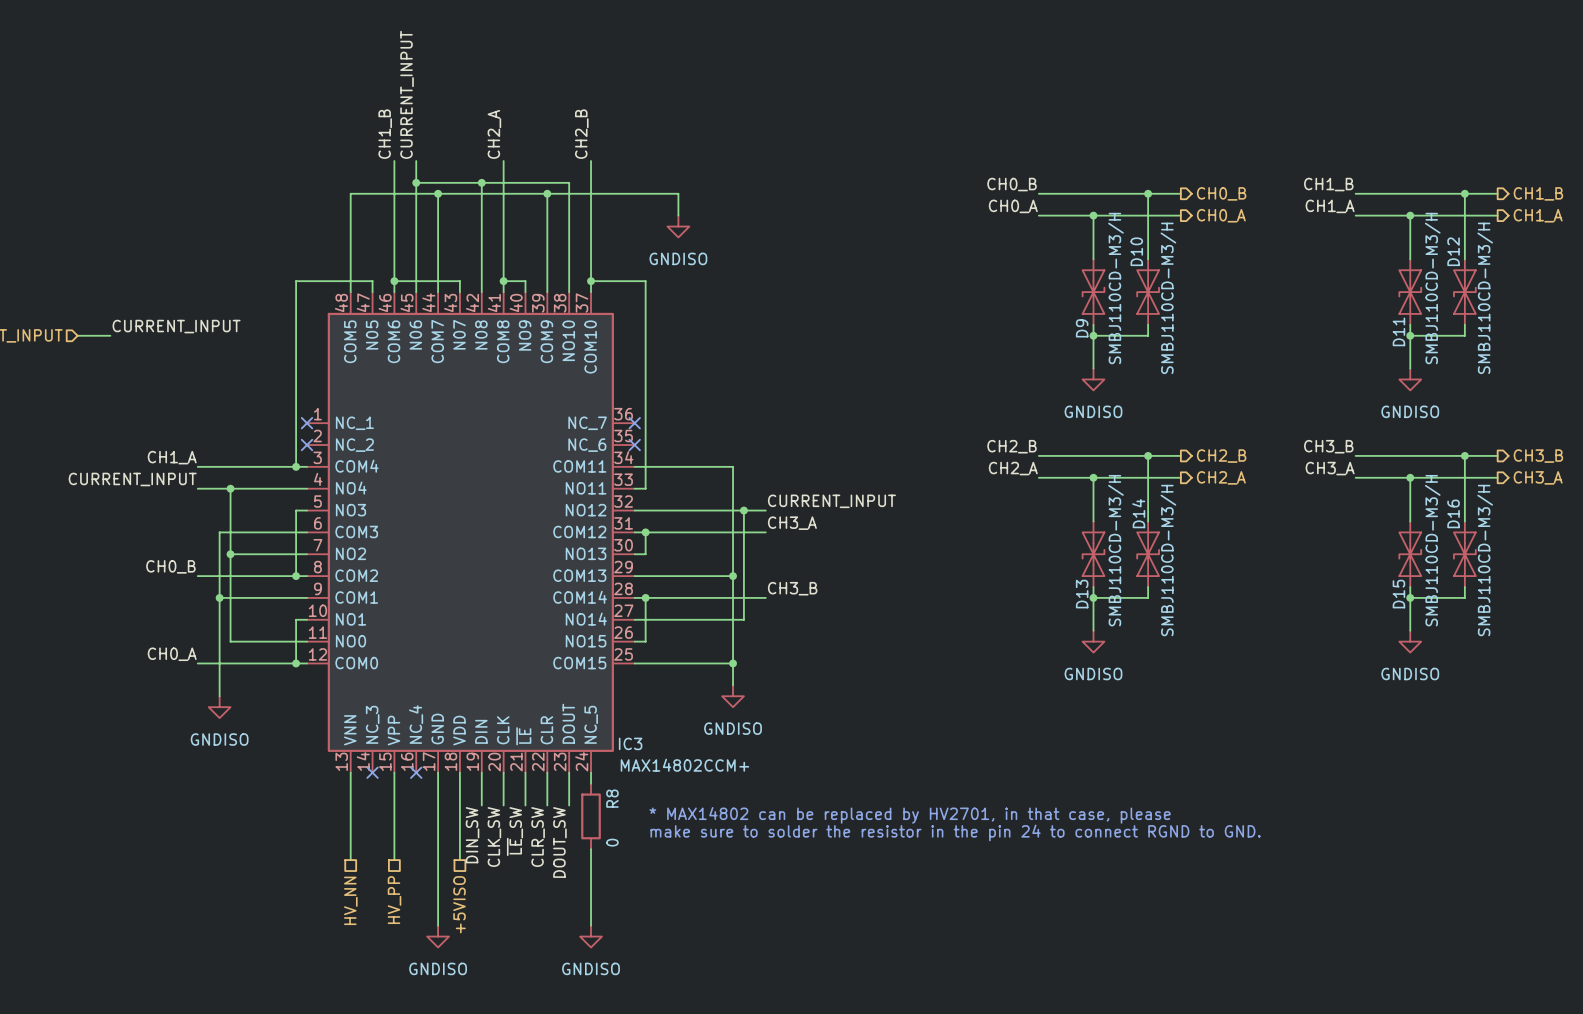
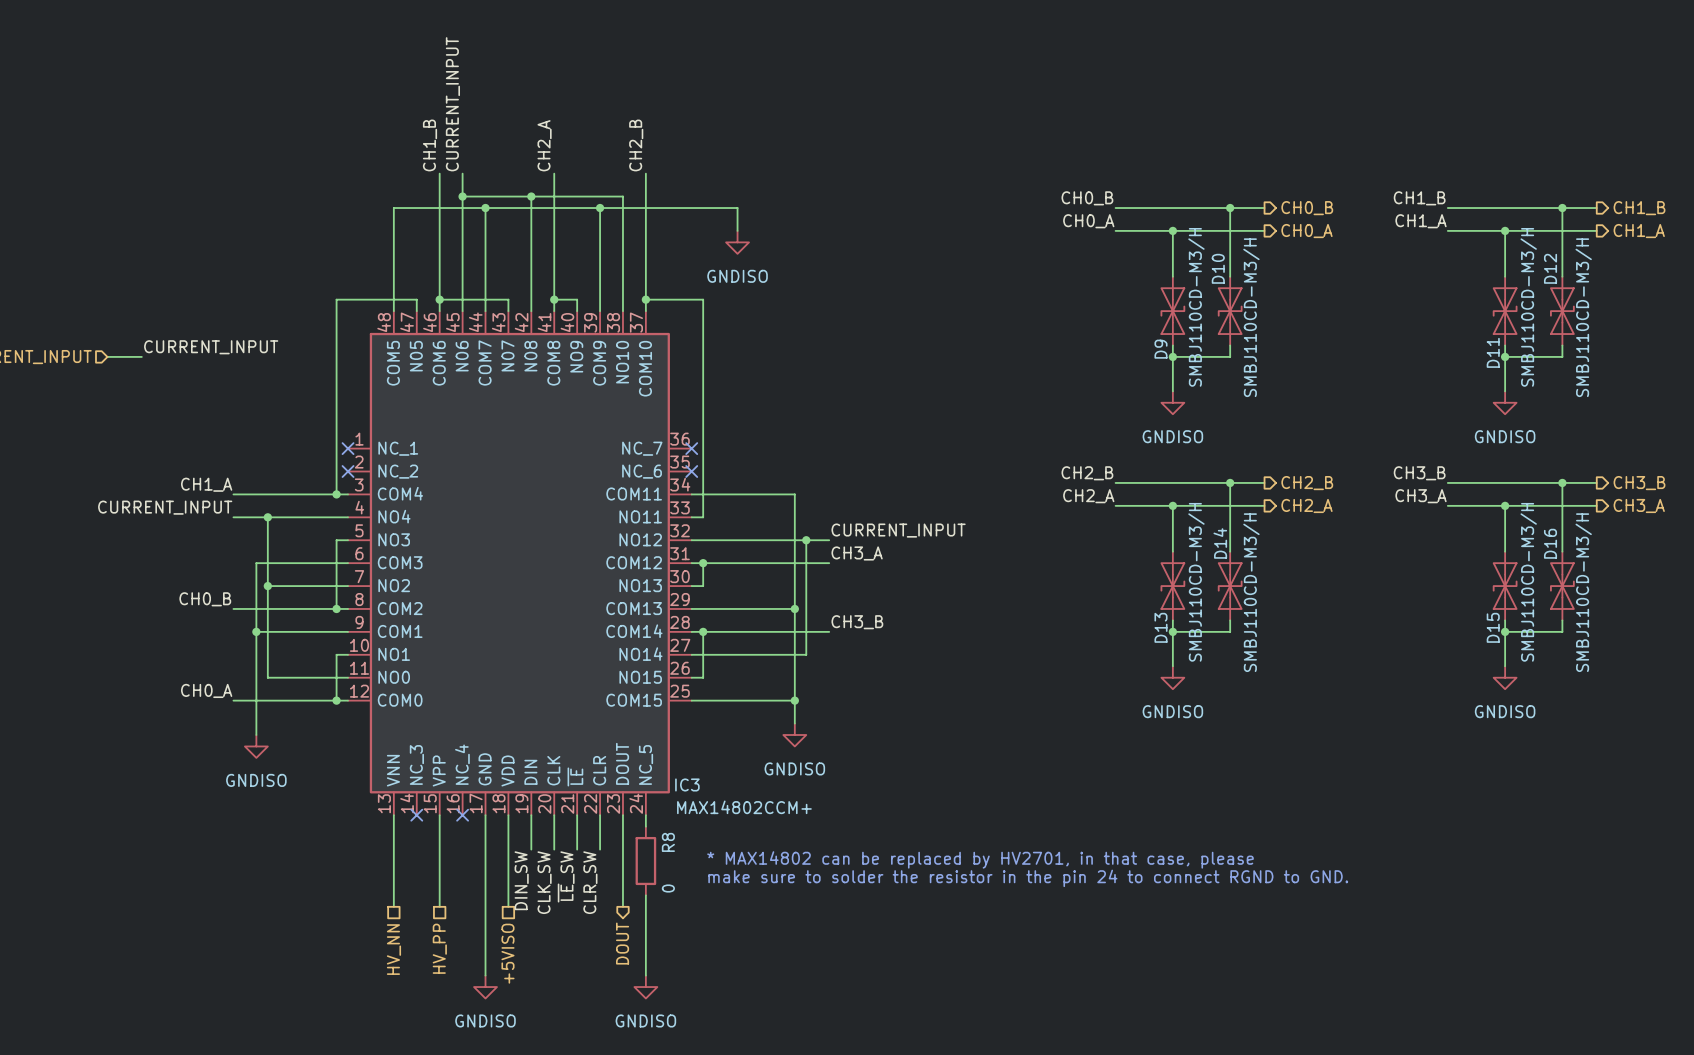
wire: none -> (622, 849) (622, 906)
label: DOUT_SW (559, 842) -> none
hierarchical label: none -> DOUT (622, 943)

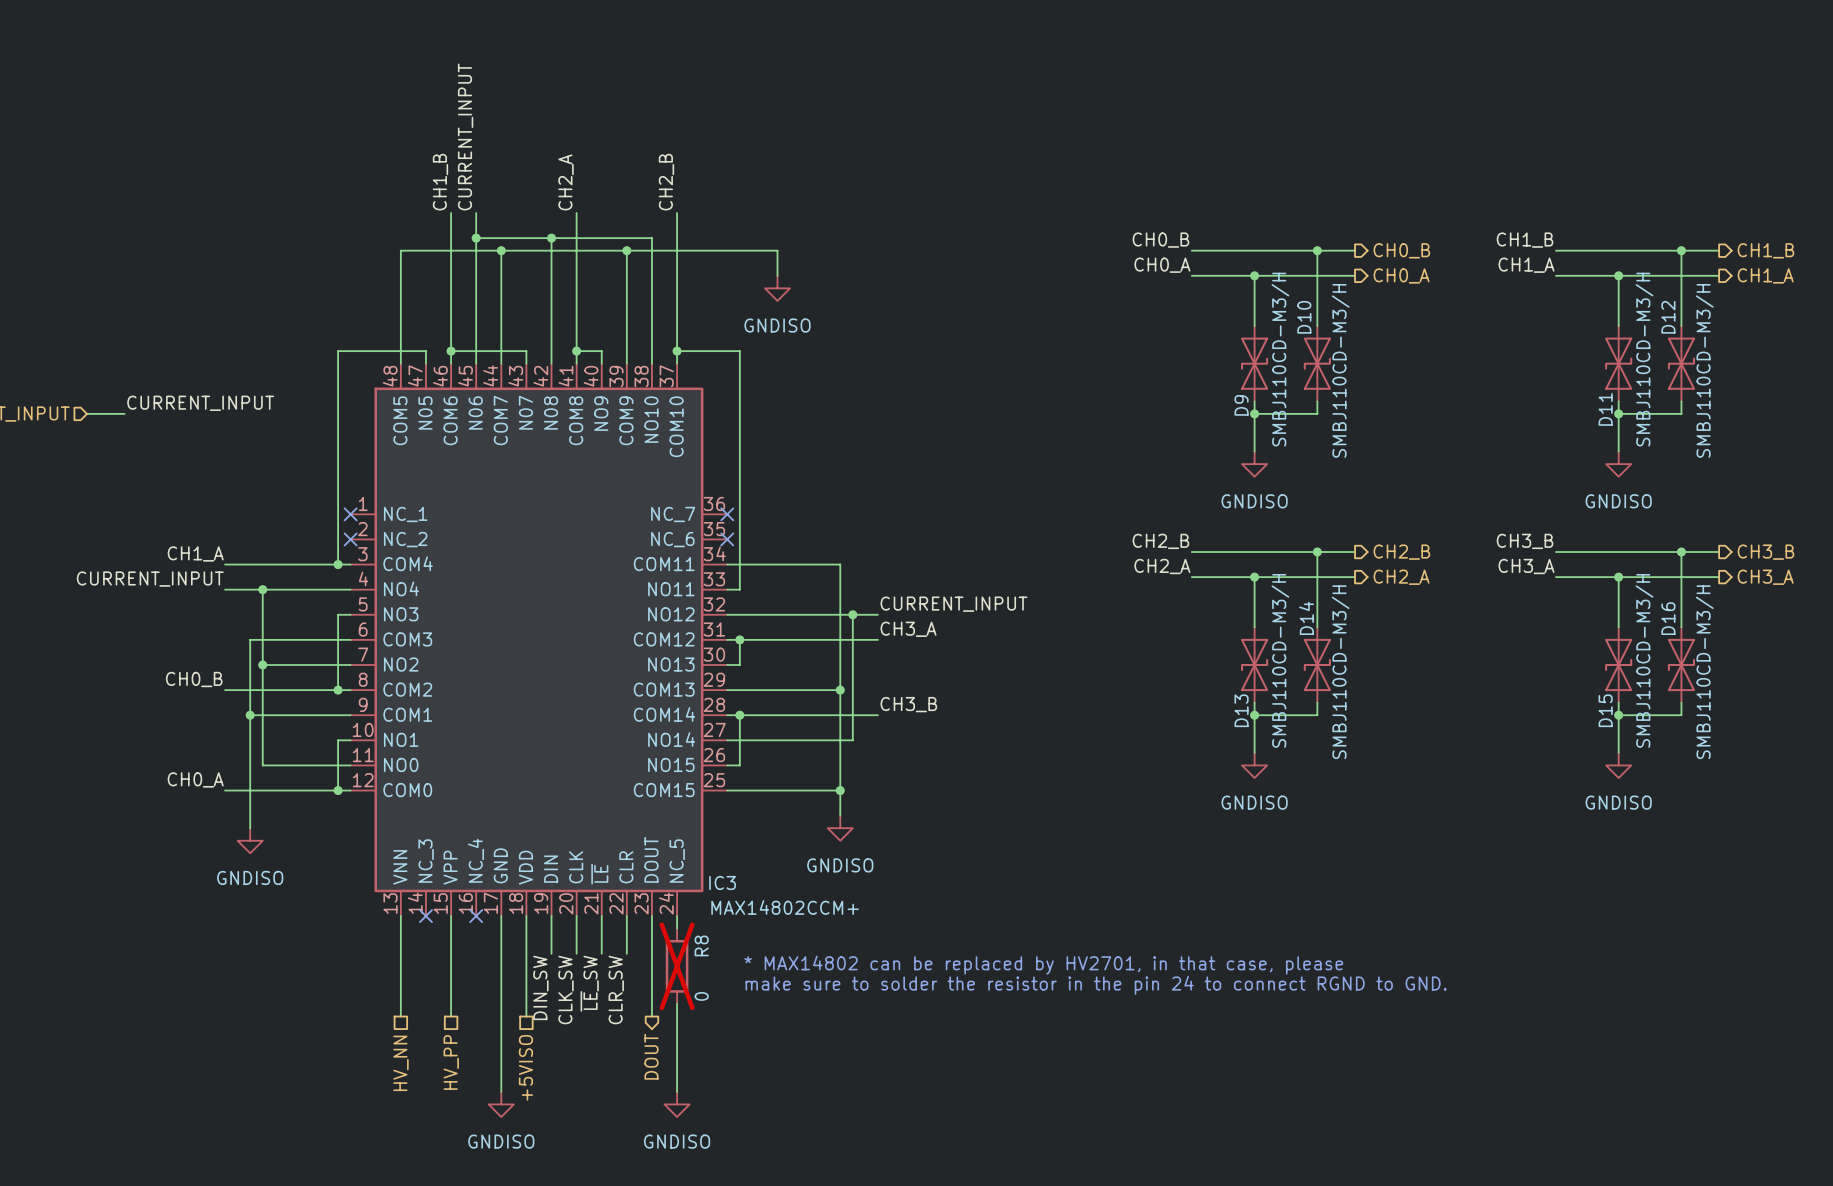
R8 do-not-place cross: none -> (677, 966)

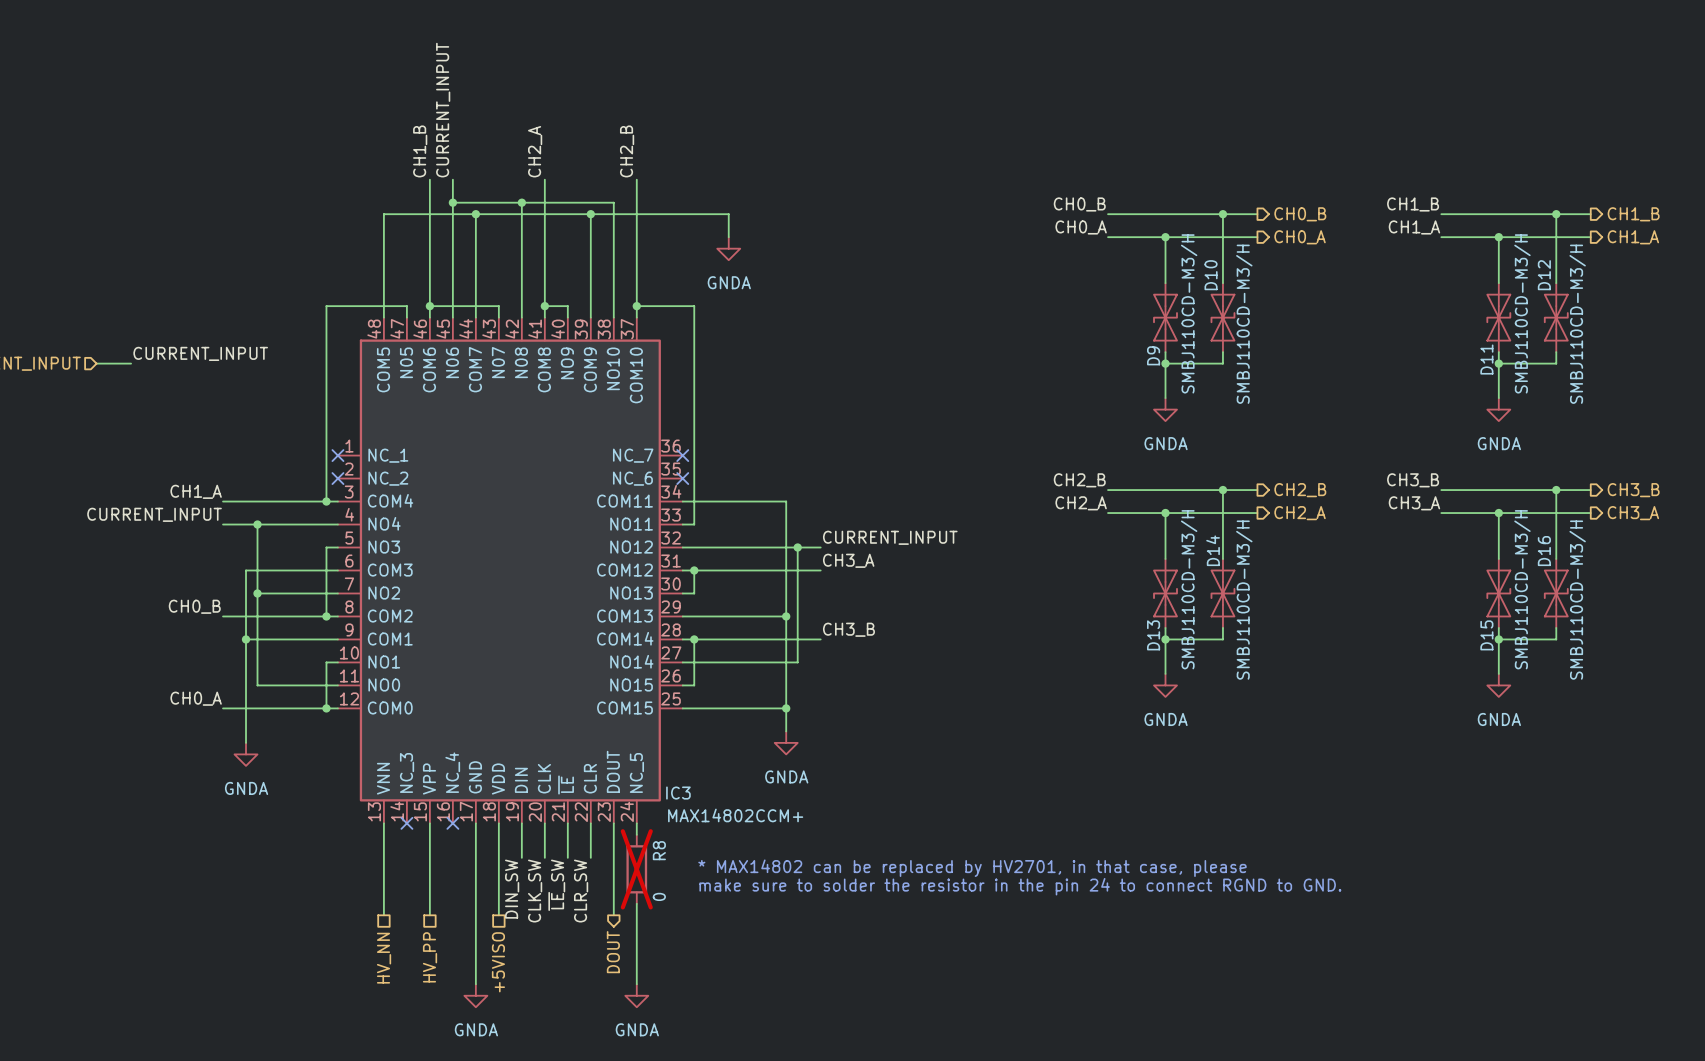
power symbol: GNDISO (777, 288) -> GNDA (728, 248)
power symbol: GNDISO (1254, 464) -> GNDA (1165, 409)
power symbol: GNDISO (1618, 464) -> GNDA (1498, 409)
power symbol: GNDISO (1254, 765) -> GNDA (1165, 685)
power symbol: GNDISO (1618, 765) -> GNDA (1498, 685)
power symbol: GNDISO (840, 828) -> GNDA (786, 742)
power symbol: GNDISO (250, 840) -> GNDA (246, 754)
power symbol: GNDISO (501, 1104) -> GNDA (475, 995)
power symbol: GNDISO (677, 1104) -> GNDA (636, 995)

